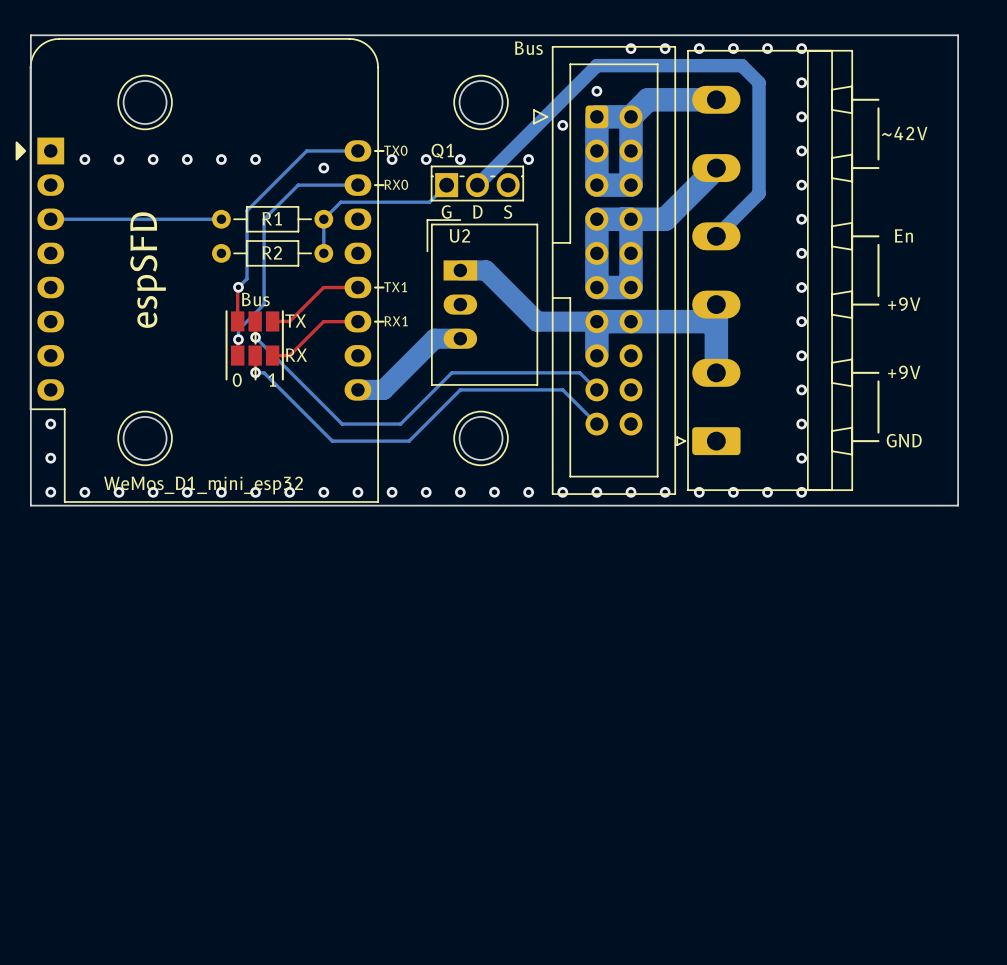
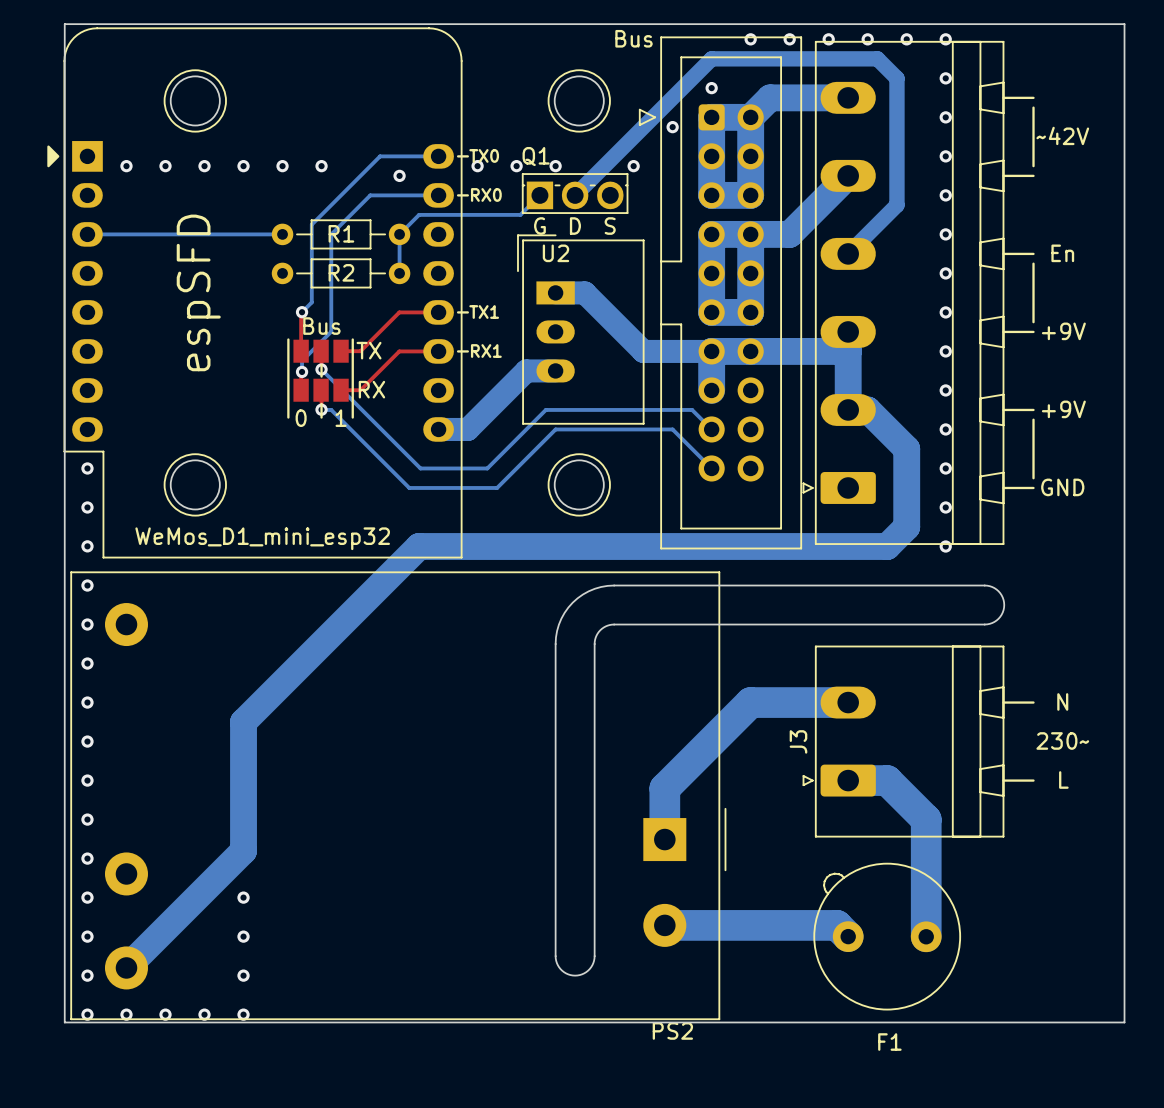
bottom track: none -> (848, 409) (867, 409) (906, 448) (906, 526) (887, 546) (419, 546) (243, 722) (243, 850) (126, 967)
via: (84, 492) -> none
via: (119, 492) -> none
via: (153, 492) -> none
via: (187, 492) -> none
via: (221, 492) -> none
via: (255, 492) -> none
via: (289, 492) -> none
via: (323, 492) -> none
via: (357, 492) -> none
via: (392, 492) -> none
via: (426, 492) -> none
via: (460, 492) -> none
via: (494, 492) -> none
via: (528, 492) -> none
via: (562, 492) -> none
via: (596, 492) -> none
via: (631, 492) -> none
via: (665, 492) -> none
via: (699, 492) -> none
via: (733, 492) -> none
via: (767, 492) -> none
board edge: (30, 505) (958, 505) -> (64, 561) (64, 1022) (1124, 1022) (1124, 561)
via: none -> (87, 585)
board edge: none -> (614, 585) (984, 585) (998, 591) (1004, 605) (998, 618) (984, 624) (614, 624) (601, 628) (596, 635) (594, 644) (594, 958) (592, 965) (586, 972) (572, 975) (560, 969) (555, 956) (555, 637) (561, 618) (572, 602) (594, 588) (614, 585)
via: none -> (87, 624)
via: none -> (87, 663)
via: none -> (87, 702)
bottom track: none -> (848, 702) (750, 702) (664, 788) (664, 839)
line: none -> (1003, 702) (1033, 702)
text: none -> N (1062, 701)
via: none -> (87, 741)
J3: none -> (903, 741)
text: none -> 230~ (1062, 740)
text: none -> L (1063, 780)
via: none -> (87, 780)
bottom track: none -> (848, 780) (887, 780) (926, 819) (926, 936)
line: none -> (1003, 780) (1033, 780)
PS2: none -> (398, 795)
via: none -> (87, 819)
via: none -> (87, 858)
via: none -> (87, 897)
via: none -> (243, 897)
bottom track: none -> (664, 925) (836, 925) (848, 936)
via: none -> (87, 936)
via: none -> (243, 936)
F1: none -> (887, 936)
via: none -> (87, 975)
via: none -> (243, 975)
via: none -> (87, 1014)
via: none -> (126, 1014)
via: none -> (165, 1014)
via: none -> (204, 1014)
via: none -> (243, 1014)

